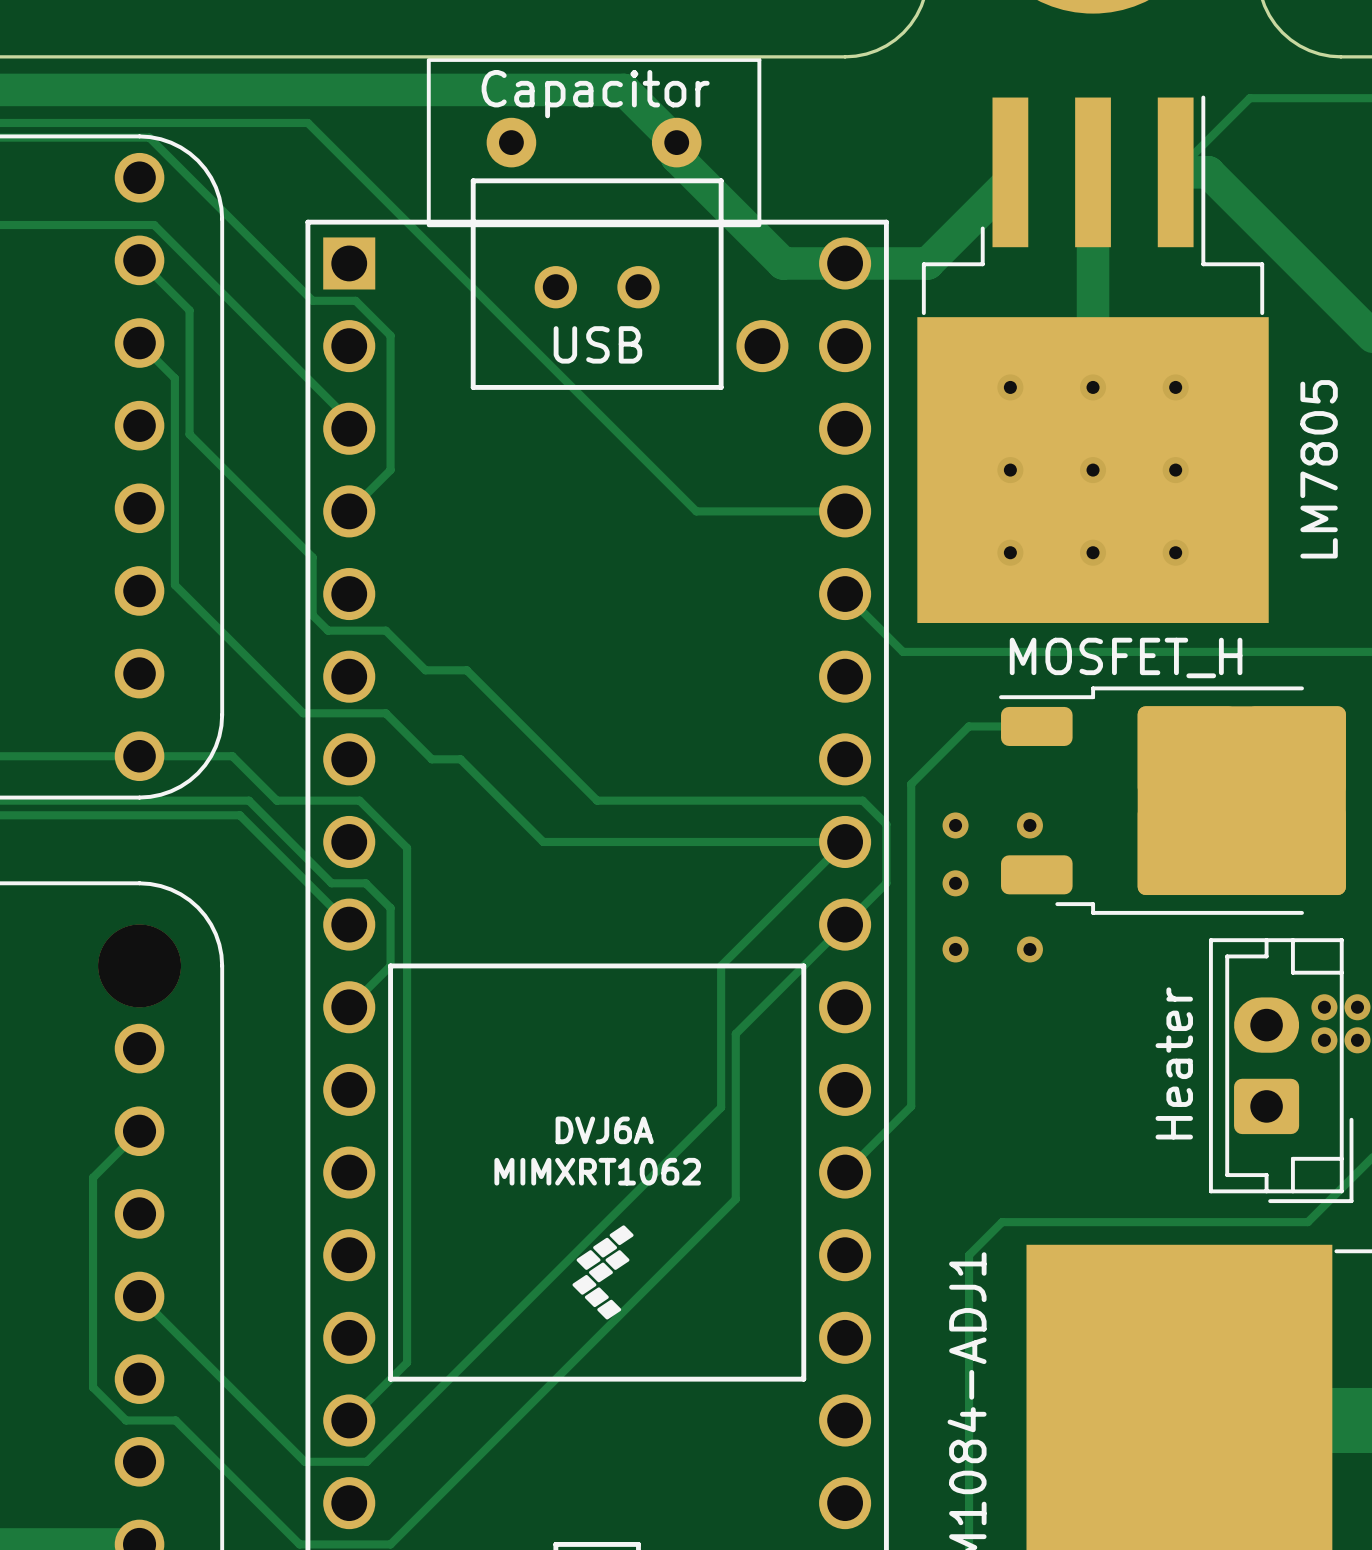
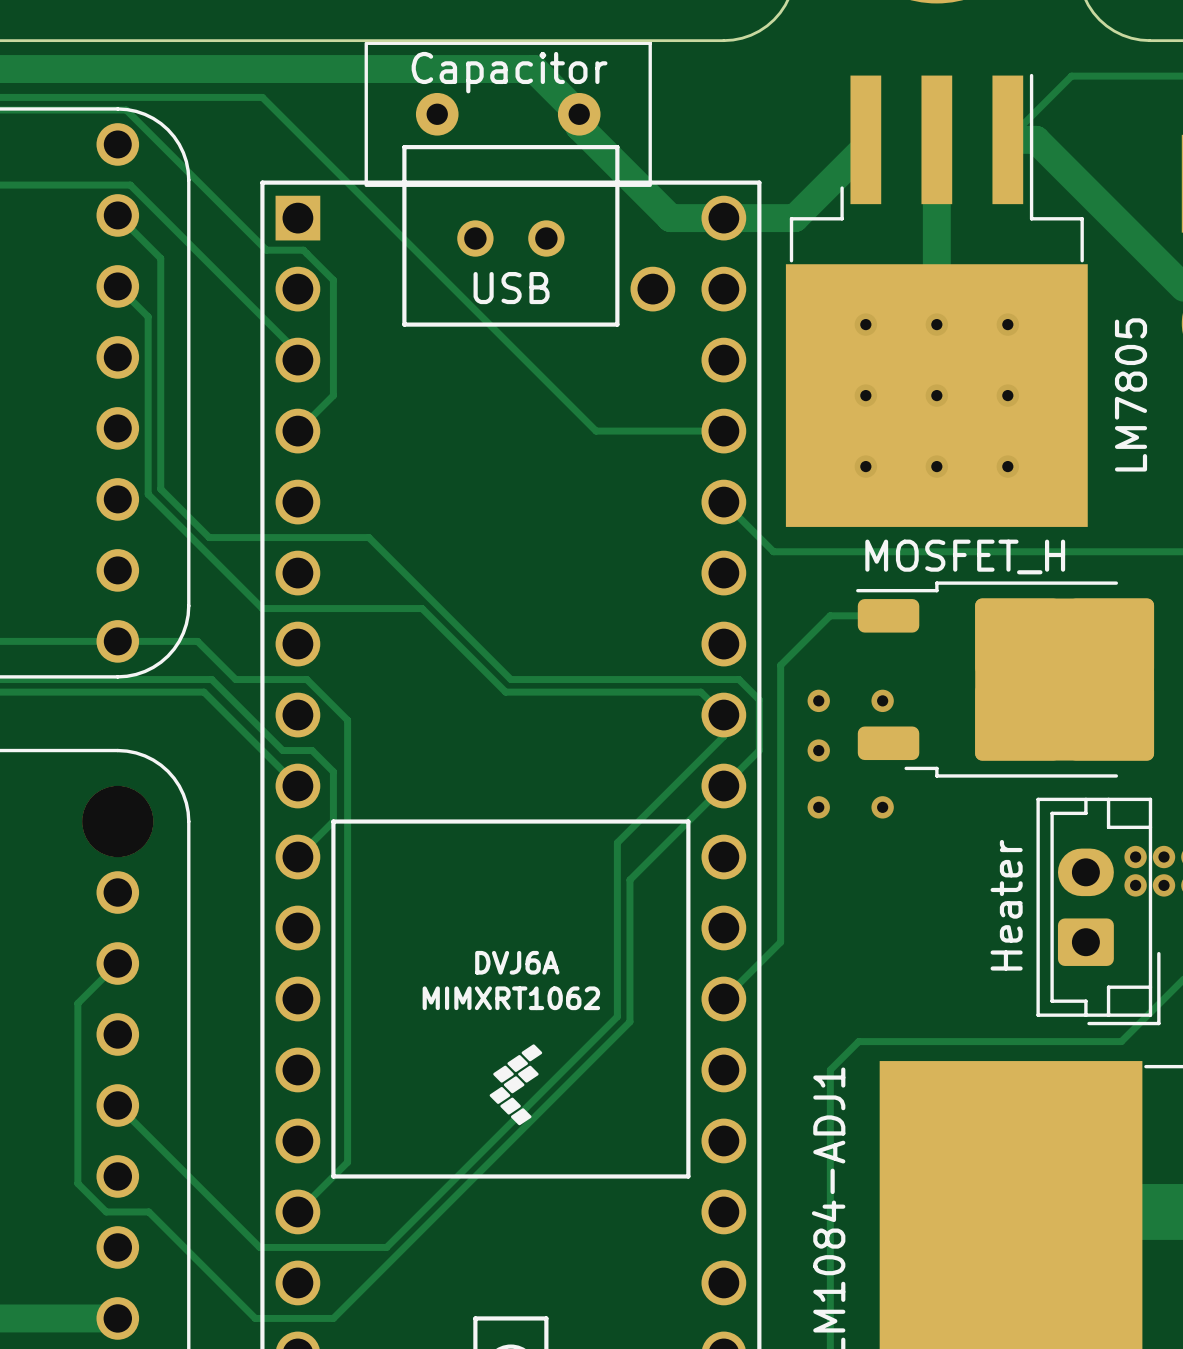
track: (189, 434) (312, 557) (312, 615) (327, 630) (385, 630) (425, 670) (466, 670) -> (160, 364) (160, 489) (209, 537) (368, 537) (398, 567)
track: (303, 713) (385, 713) (431, 759) (460, 759) (543, 841) (845, 841) (721, 965) (721, 990) -> (258, 604) (262, 608) (422, 608) (505, 692) (700, 692) (723, 715) (723, 736) (617, 842)
track: (721, 1107) (366, 1461) -> (617, 943) (617, 1016) (386, 1247) (313, 1247)

